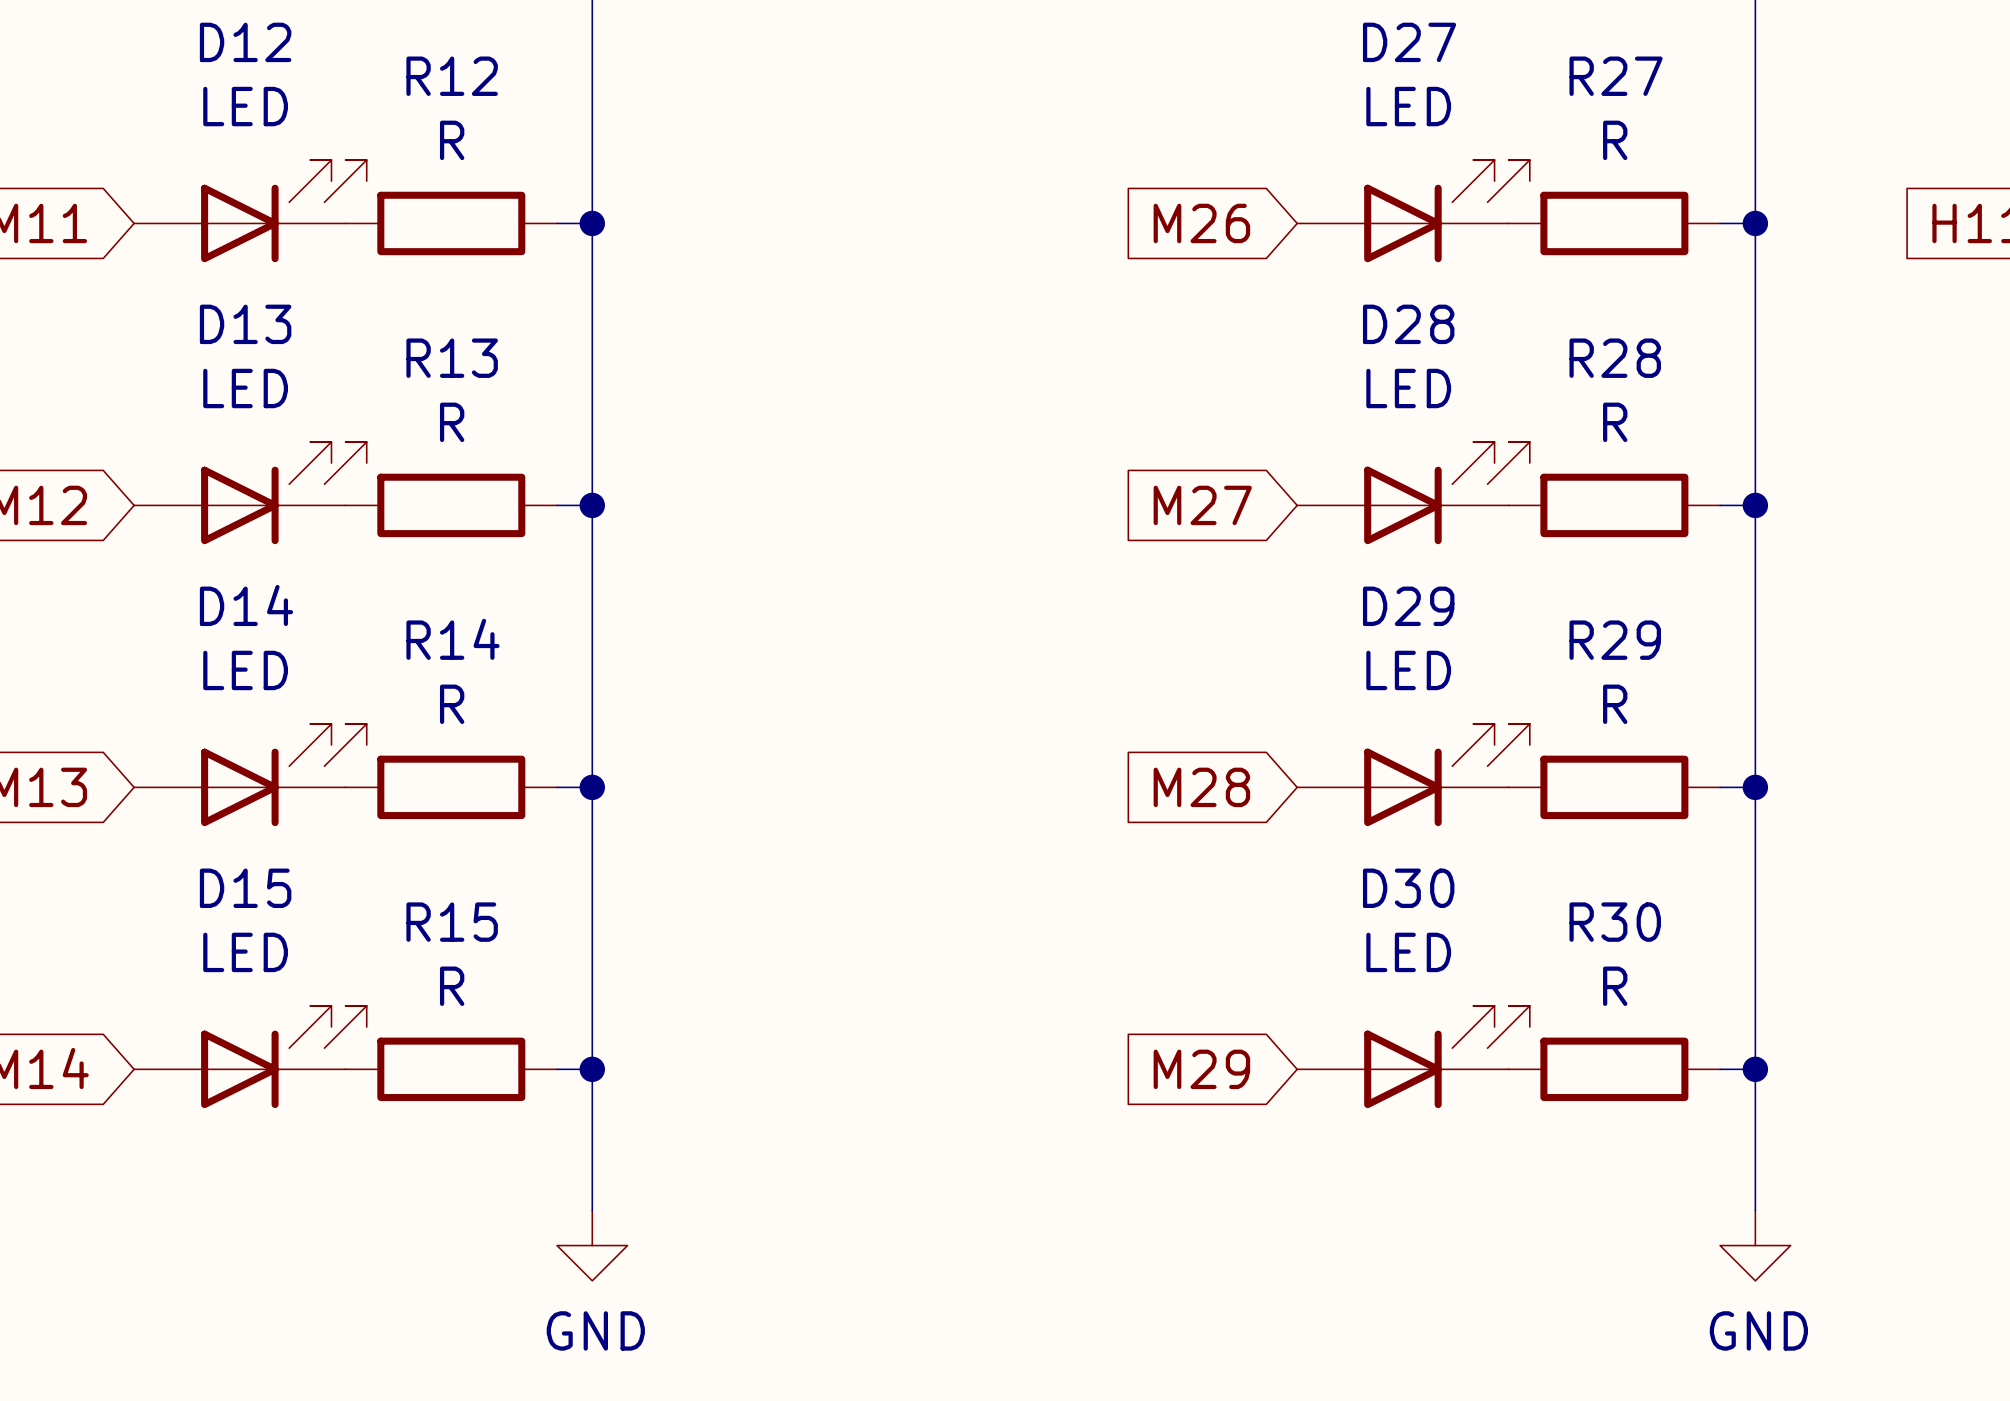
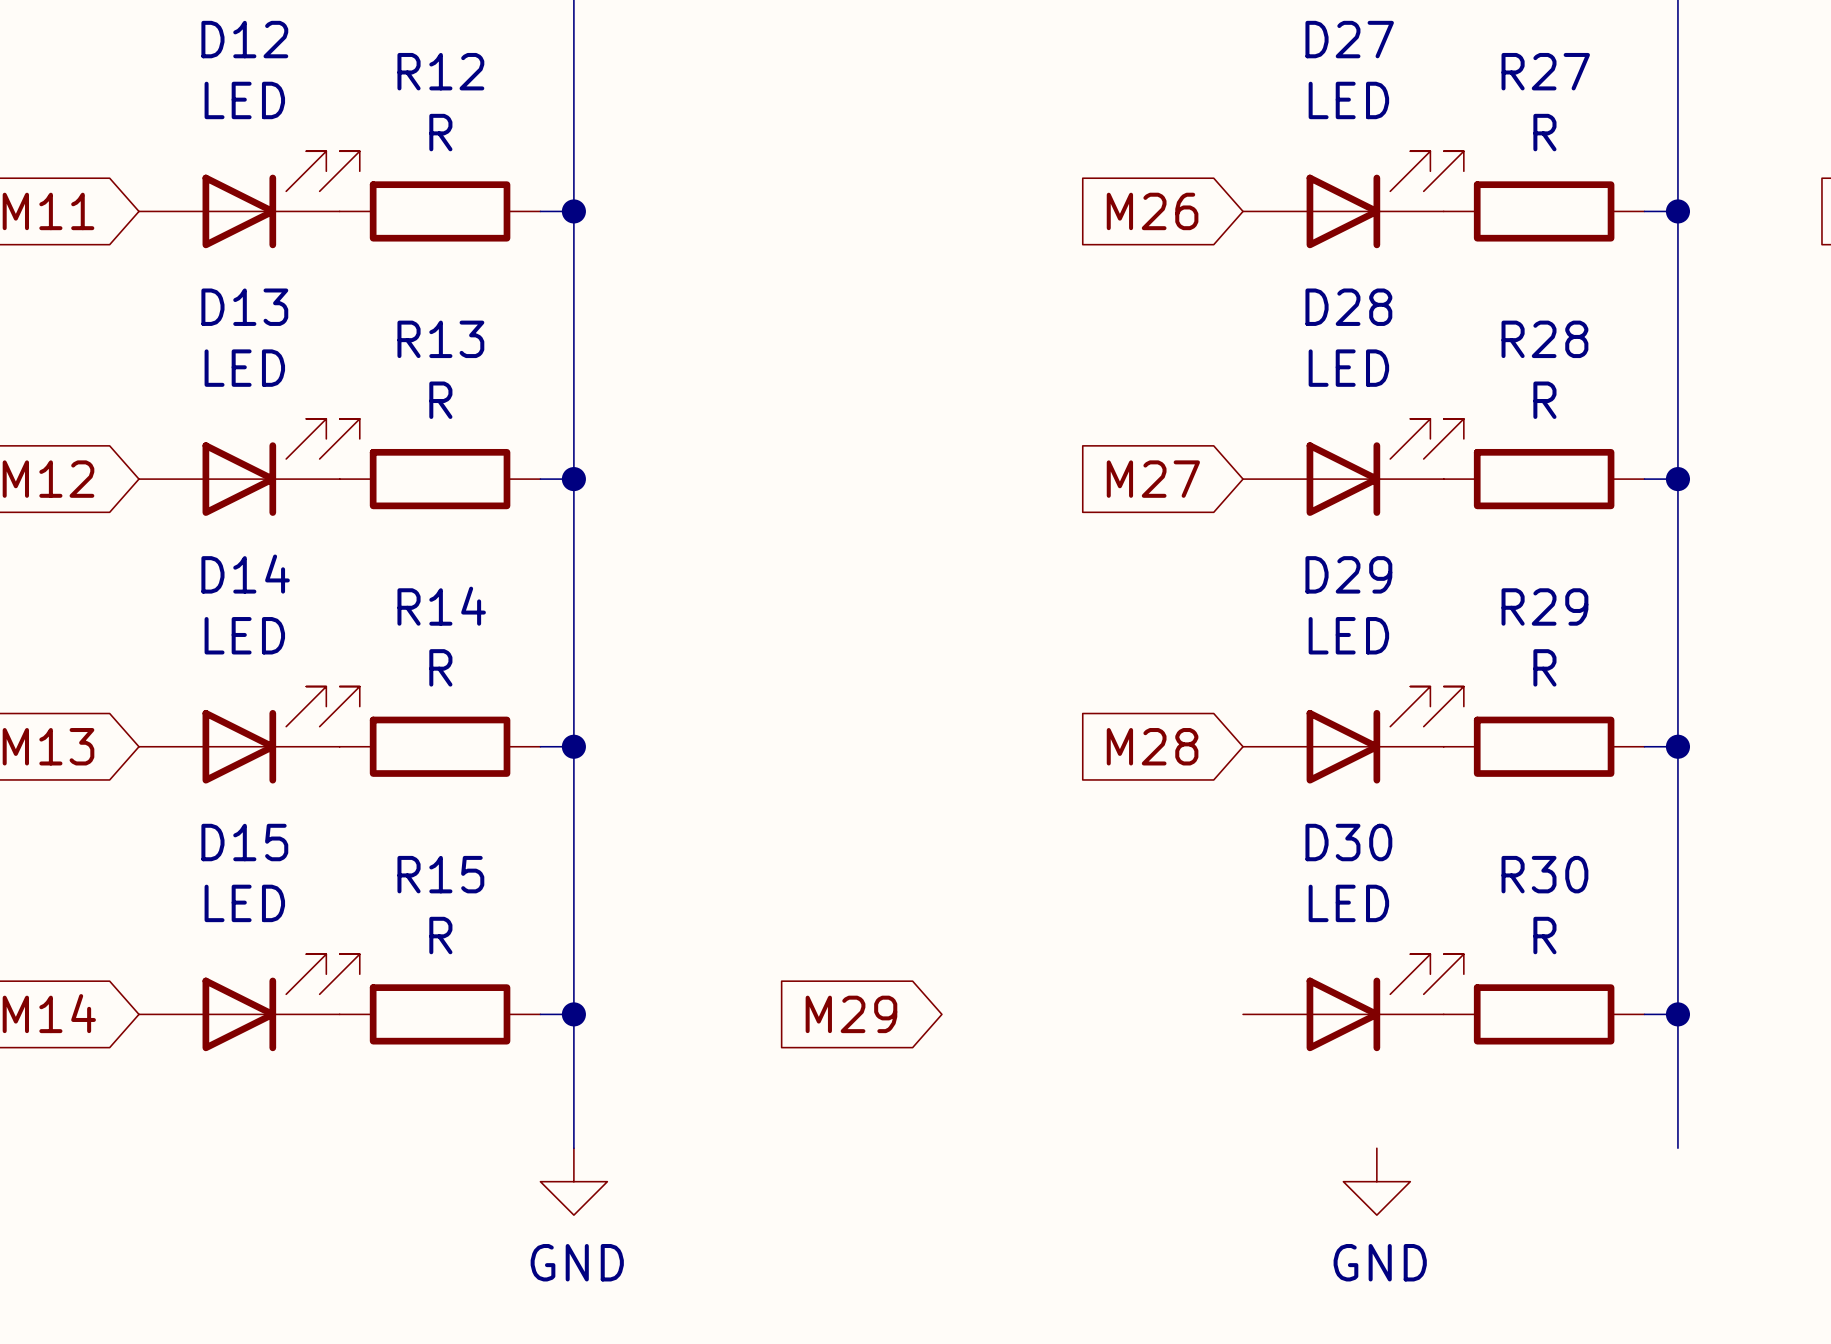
global label position: M29 (1201, 1069) -> M29 (851, 1014)
power symbol position: GND (1755, 1245) -> GND (1376, 1181)

